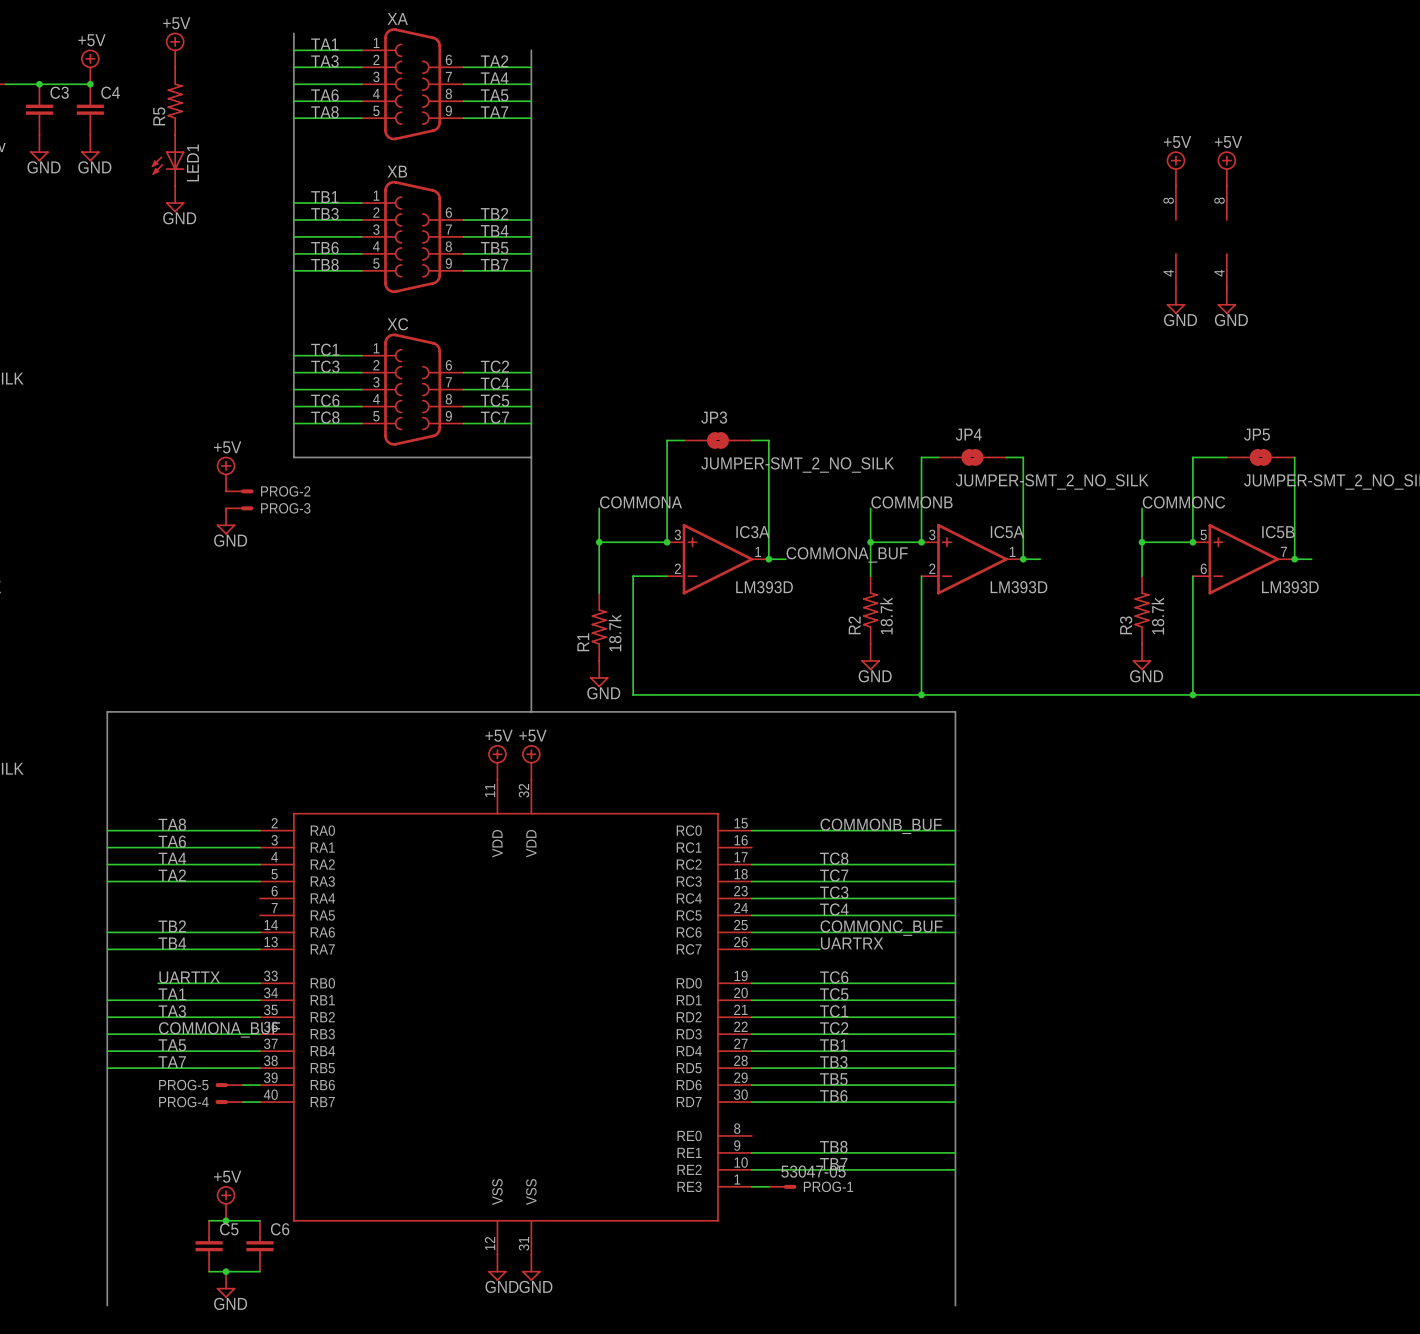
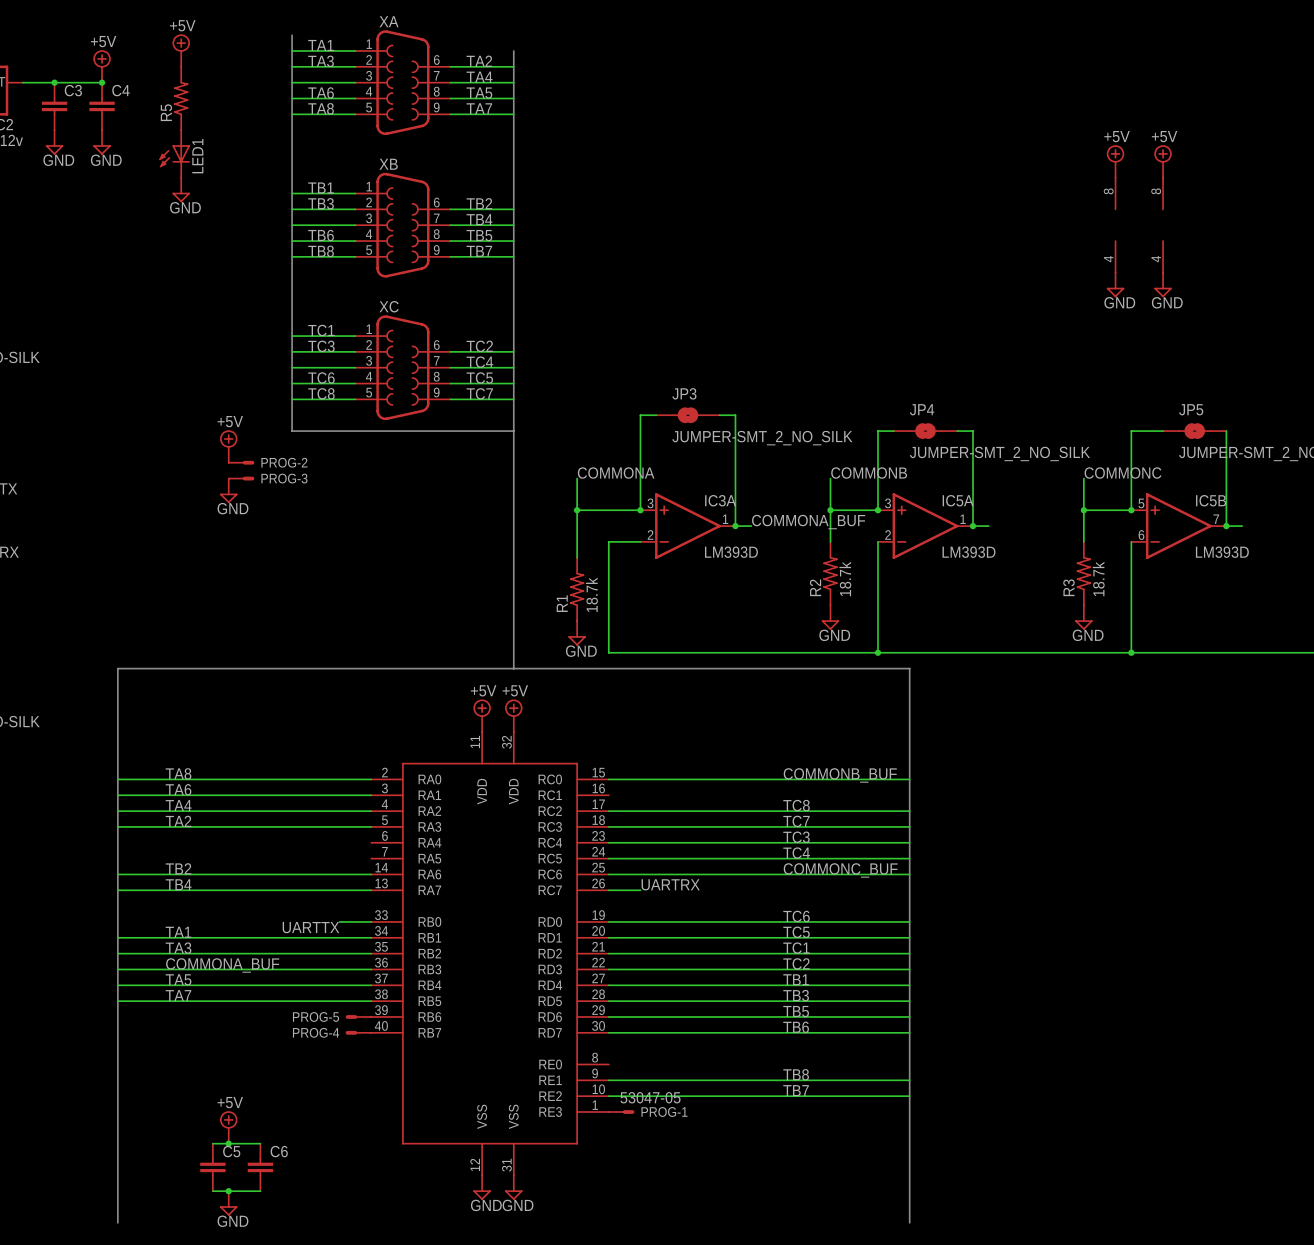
part symbol: [259, 779, 752, 1255] -> [371, 731, 609, 1176]
wire: none -> (260, 779) (371, 779)
wire: none -> (608, 779) (719, 779)
wire: none -> (260, 795) (371, 795)
wire: none -> (260, 811) (371, 811)
wire: none -> (608, 811) (719, 811)
wire: none -> (260, 826) (371, 826)
wire: none -> (608, 826) (719, 826)
wire: none -> (608, 842) (719, 842)
wire: none -> (608, 858) (719, 858)
wire: none -> (260, 874) (371, 874)
wire: none -> (608, 874) (719, 874)
label position: UARTRX (852, 943) -> UARTRX (670, 884)
wire: none -> (260, 890) (371, 890)
wire: none -> (608, 890) (640, 890)
wire: (751, 949) (819, 949) -> none
label: UARTTX (189, 977) -> none
wire: (158, 983) (259, 983) -> none
wire: none -> (339, 921) (371, 921)
wire: none -> (608, 921) (719, 921)
label: none -> UARTTX (310, 927)
wire: none -> (260, 937) (371, 937)
wire: none -> (608, 937) (719, 937)
wire: none -> (260, 953) (371, 953)
wire: none -> (608, 953) (719, 953)
wire: none -> (260, 969) (371, 969)
wire: none -> (608, 969) (719, 969)
wire: none -> (260, 985) (371, 985)
wire: none -> (608, 985) (719, 985)
wire: none -> (260, 1001) (371, 1001)
wire: none -> (608, 1001) (719, 1001)
PROG-5 position: (229, 1085) -> (358, 1016)
wire: (243, 1085) (259, 1085) -> none
wire: none -> (608, 1016) (719, 1016)
PROG-4 position: (229, 1102) -> (358, 1032)
wire: (243, 1102) (259, 1102) -> none
wire: none -> (608, 1032) (719, 1032)
wire: none -> (608, 1080) (719, 1080)
wire: none -> (608, 1096) (719, 1096)
wire: (751, 1186) (768, 1186) -> none
PROG-1 position: (782, 1186) -> (621, 1112)

